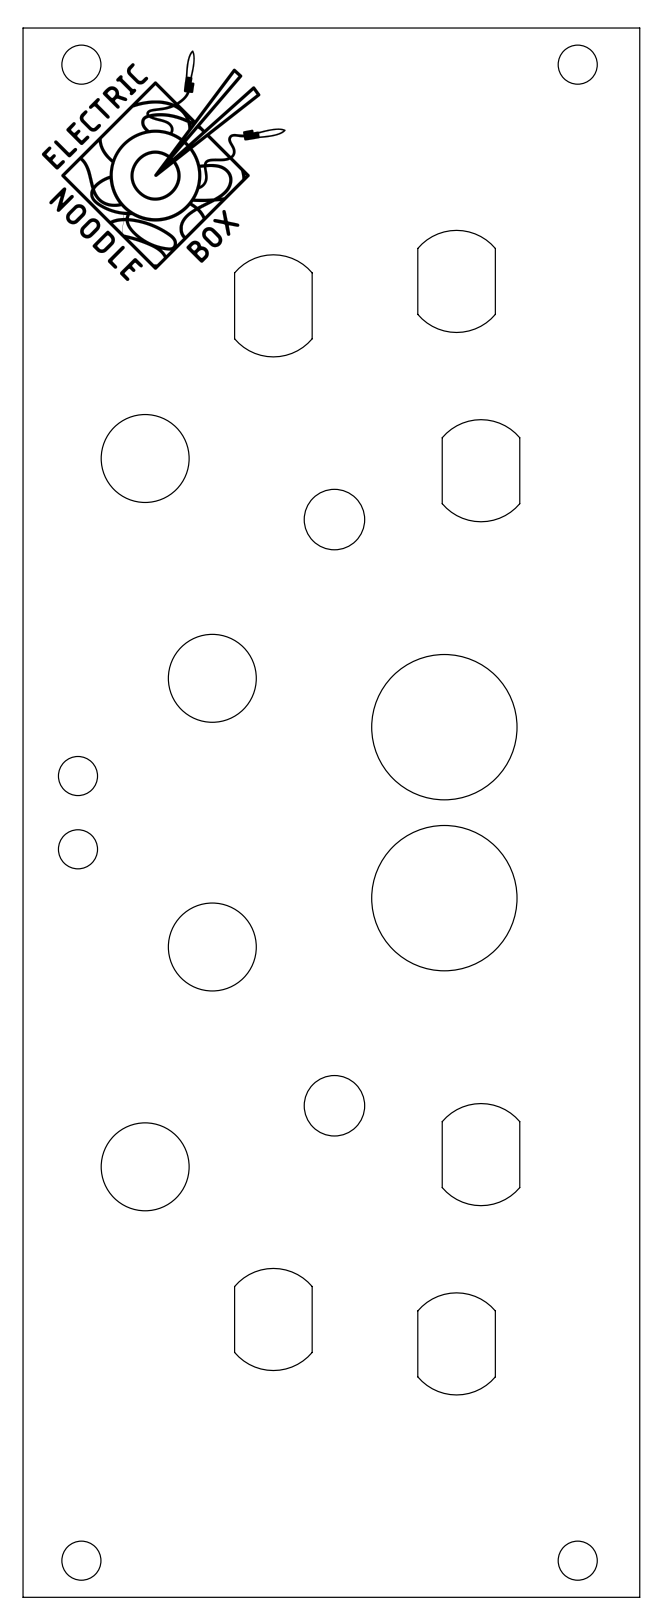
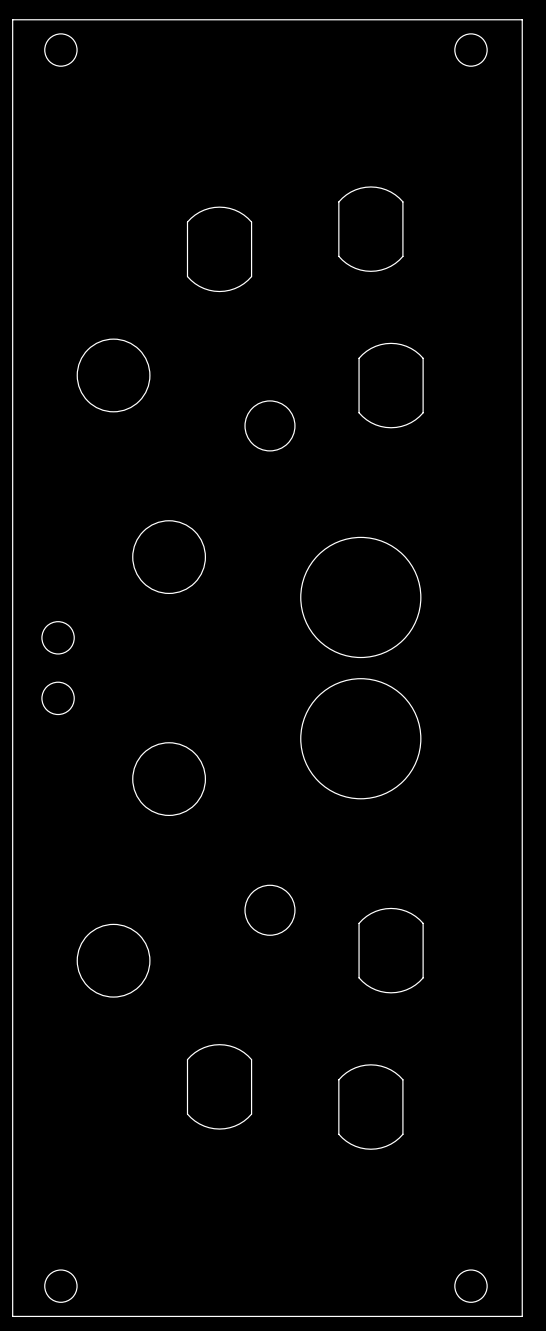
drawing: [41, 50, 286, 281] -> none

